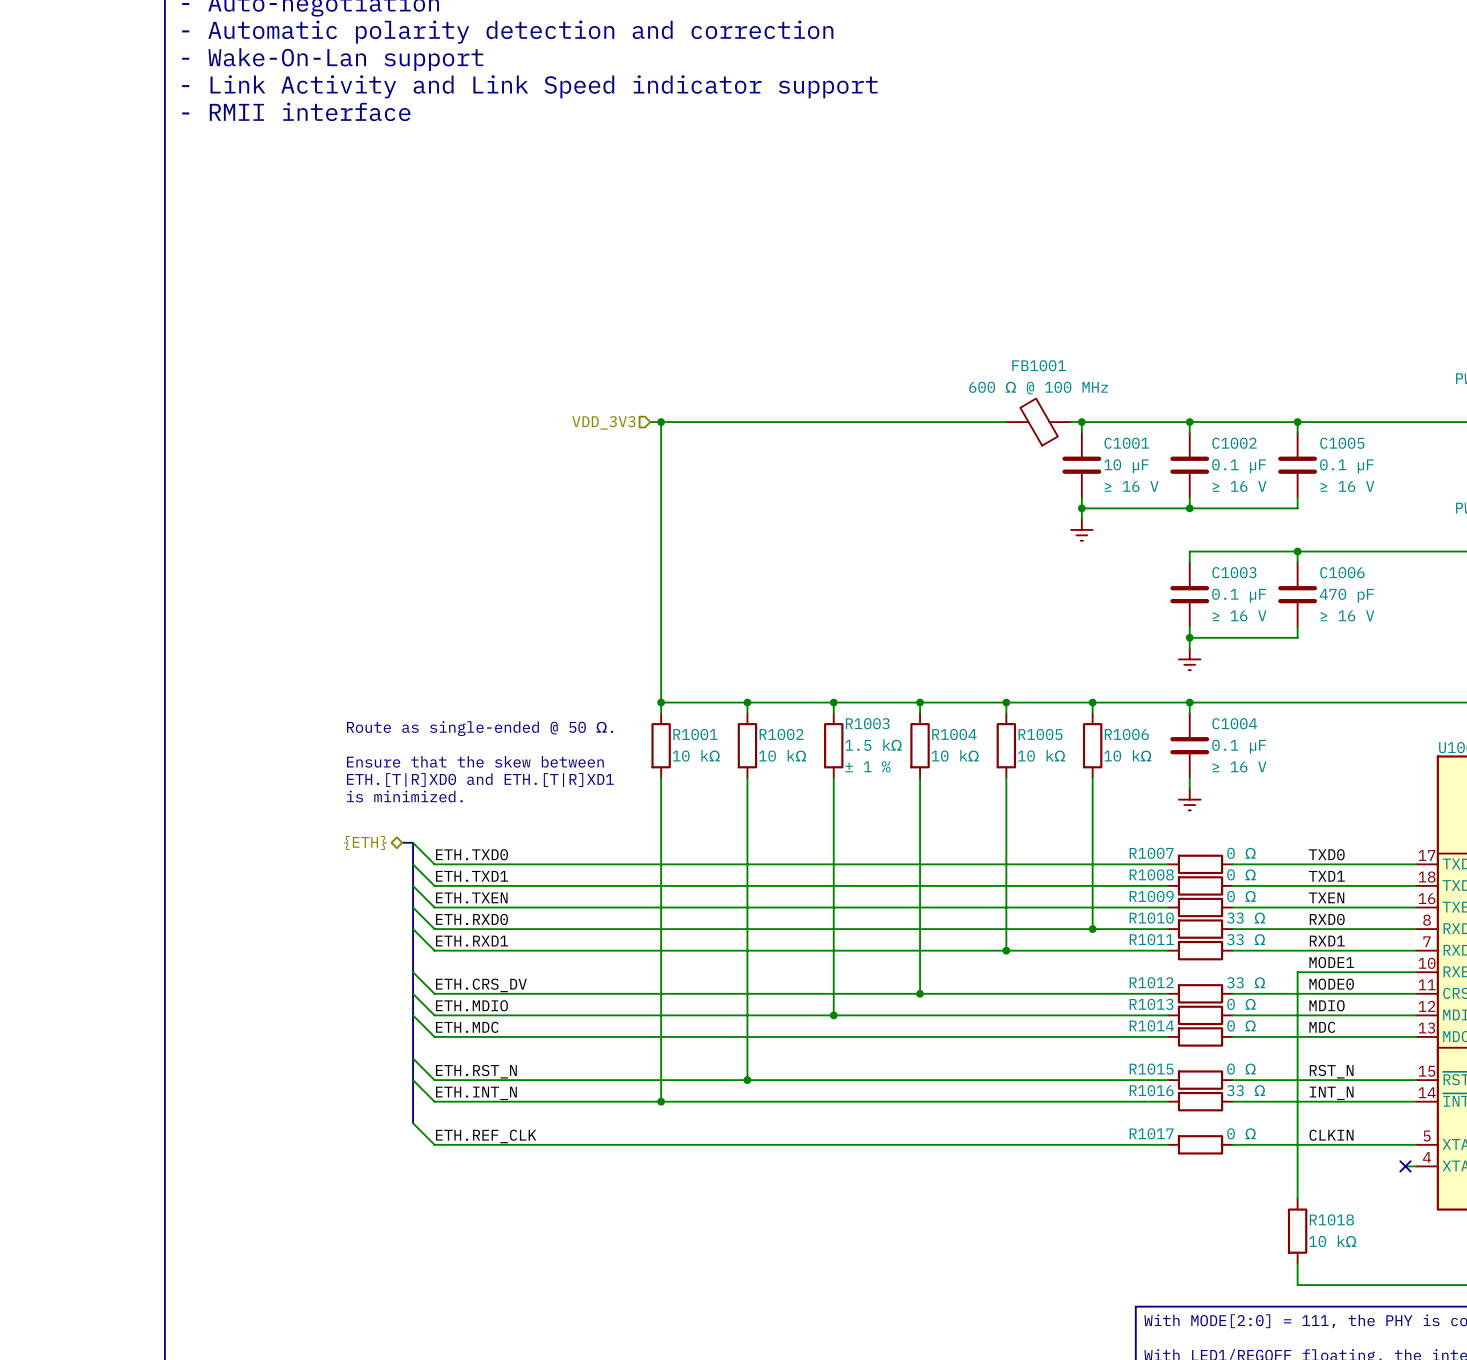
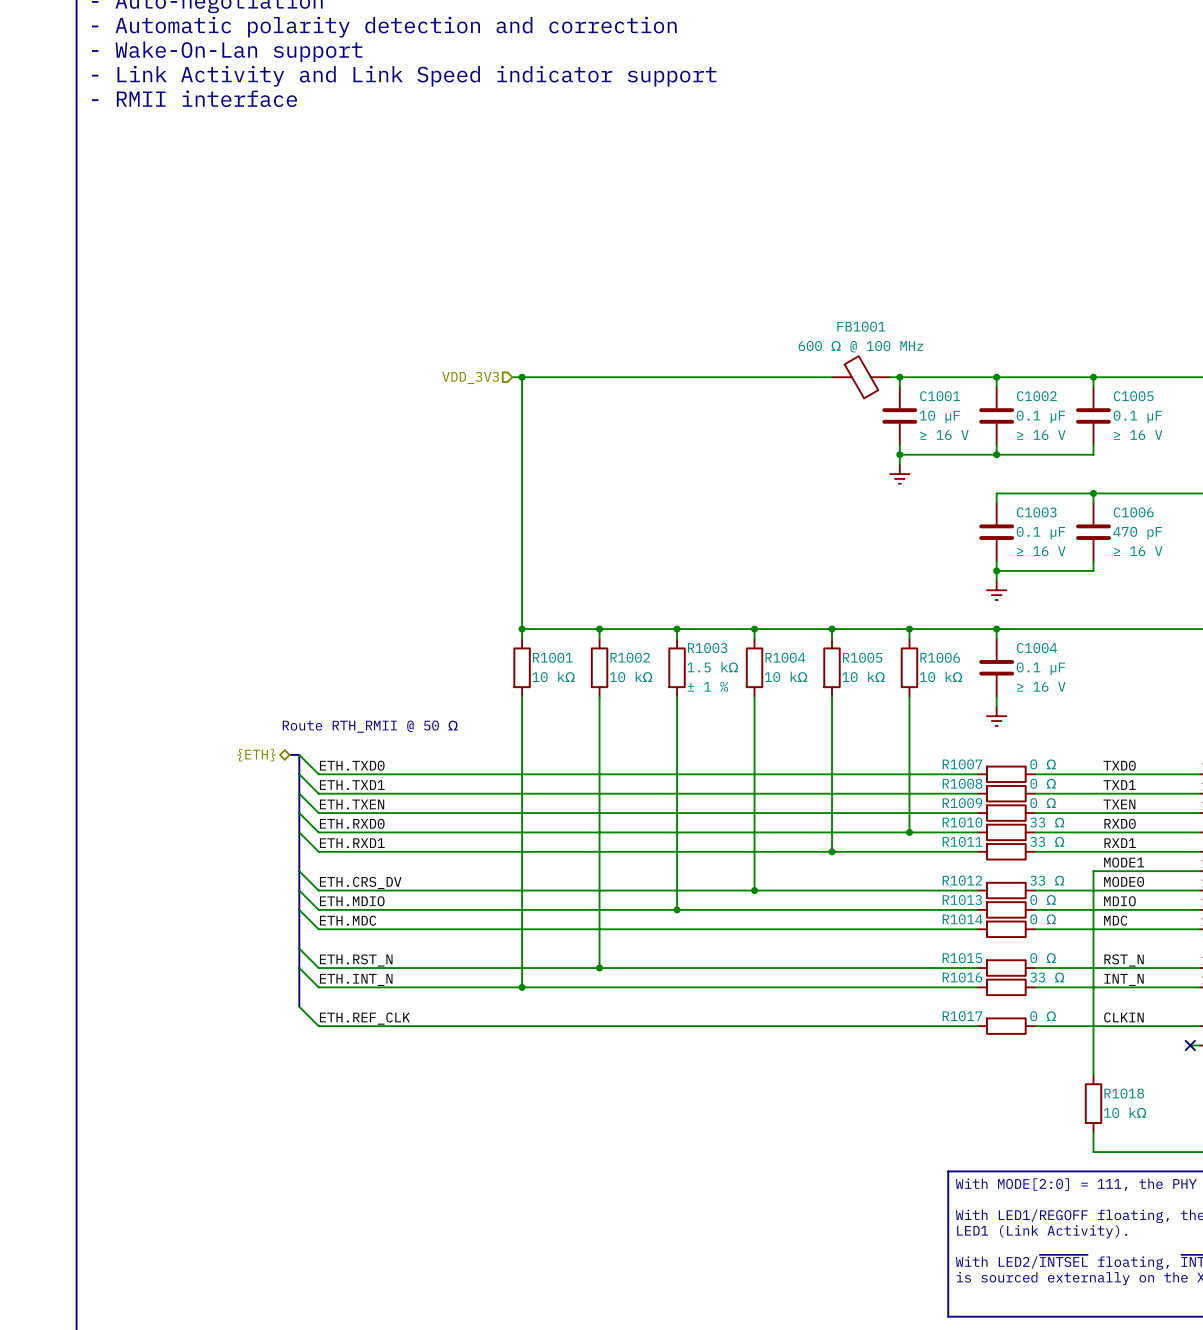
text: Route as single-ended @ 50 Ω. (480, 728) -> none
text: Ensure that the skew between (475, 761) -> none
text: ETH.[T|R]XD0 and ETH.[T|R]XD1 (480, 780) -> none
text: is minimized. (404, 796) -> none
text: none -> Route RTH_RMII @ 50 Ω (370, 726)

